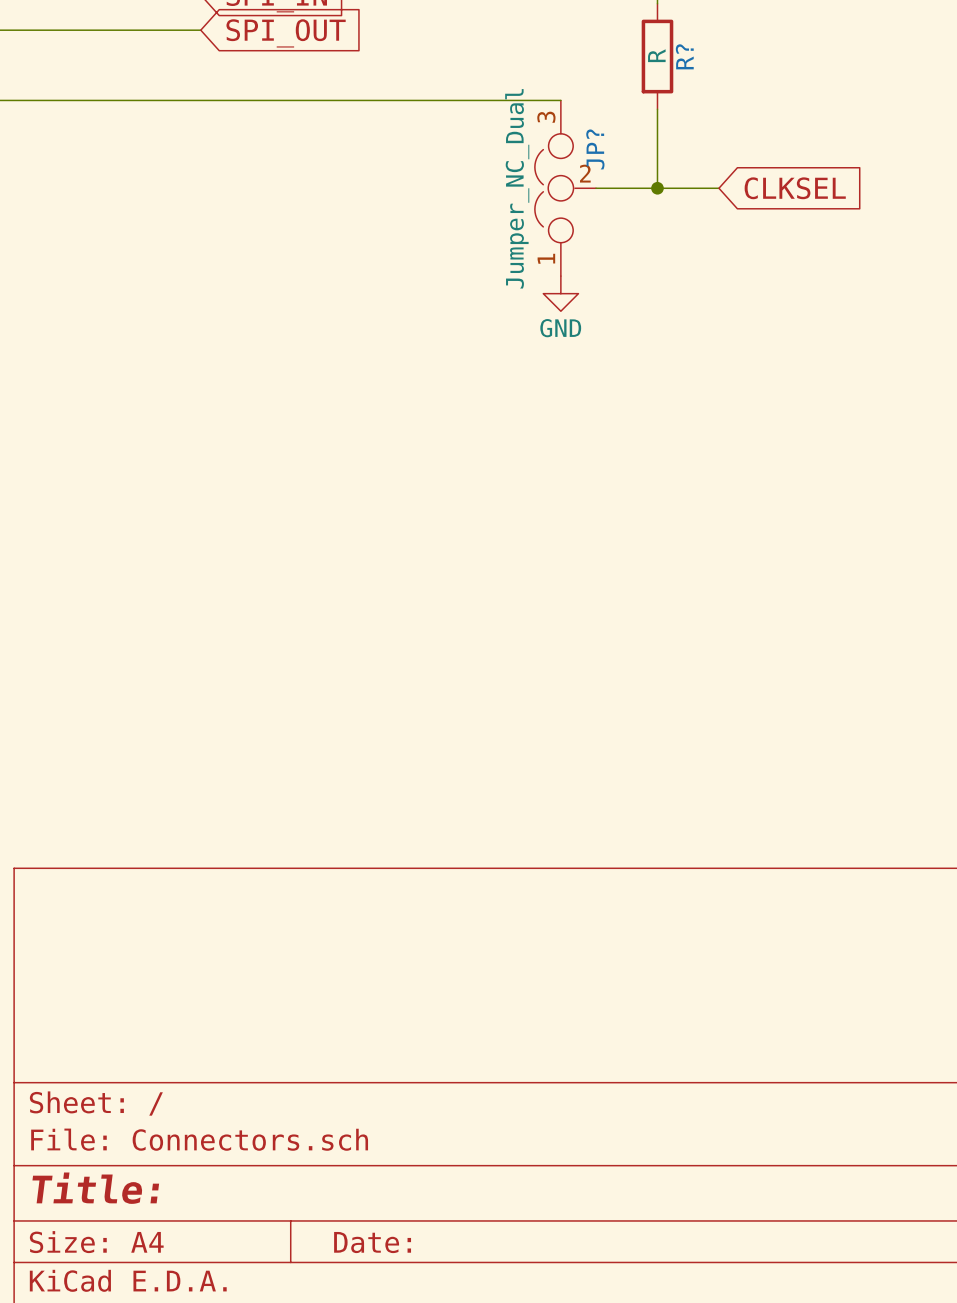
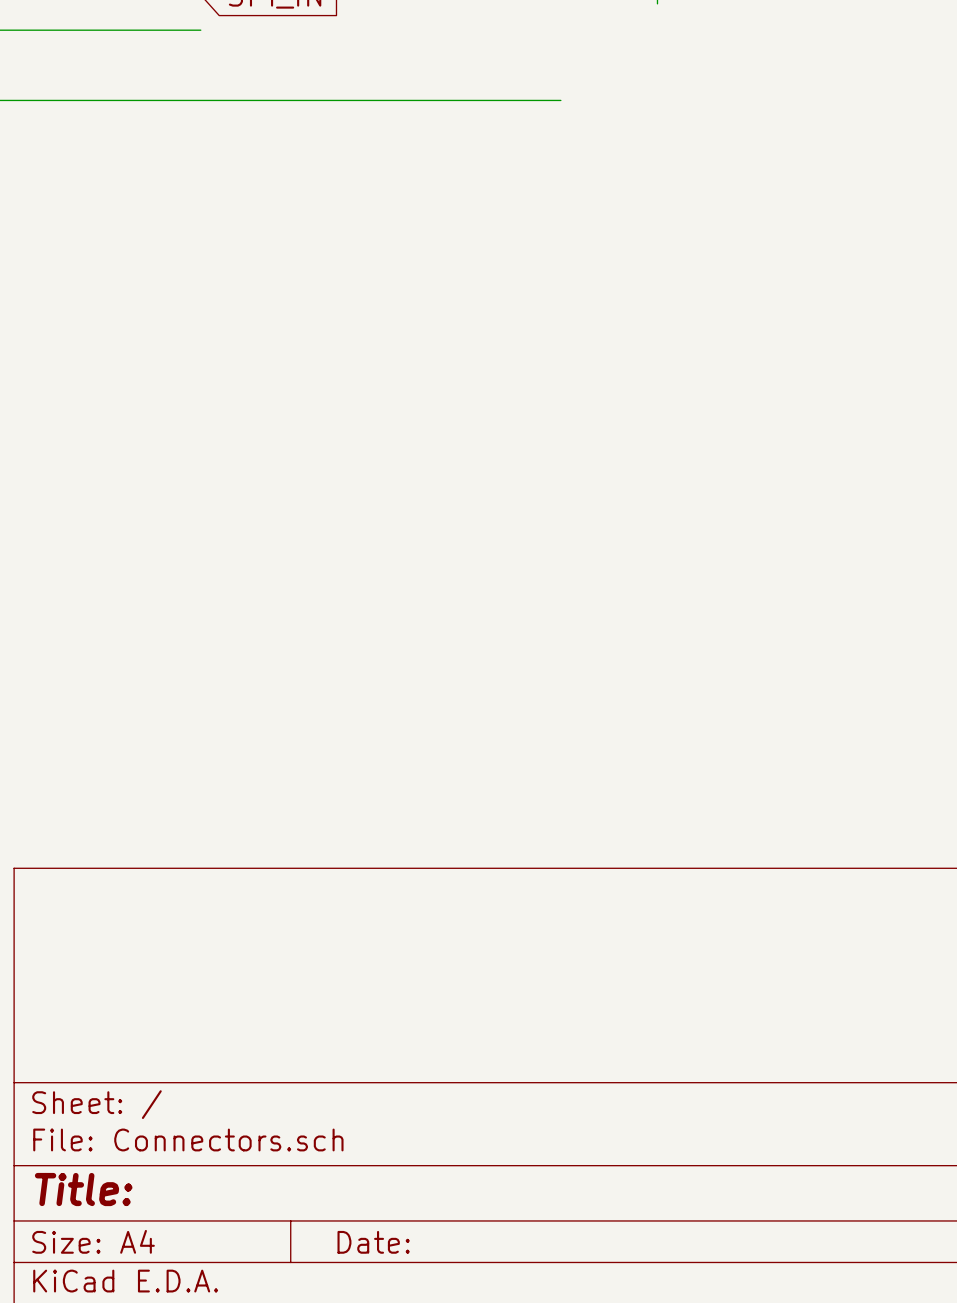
global label: SPI_OUT (286, 33) -> none
R?: R (657, 56) -> none
wire: (657, 109) (657, 188) -> none
JP?: Jumper_NC_Dual (565, 188) -> none
wire: (596, 188) (718, 188) -> none
junction: (657, 188) -> none
global label: CLKSEL (795, 188) -> none
power symbol: GND (560, 293) -> none

